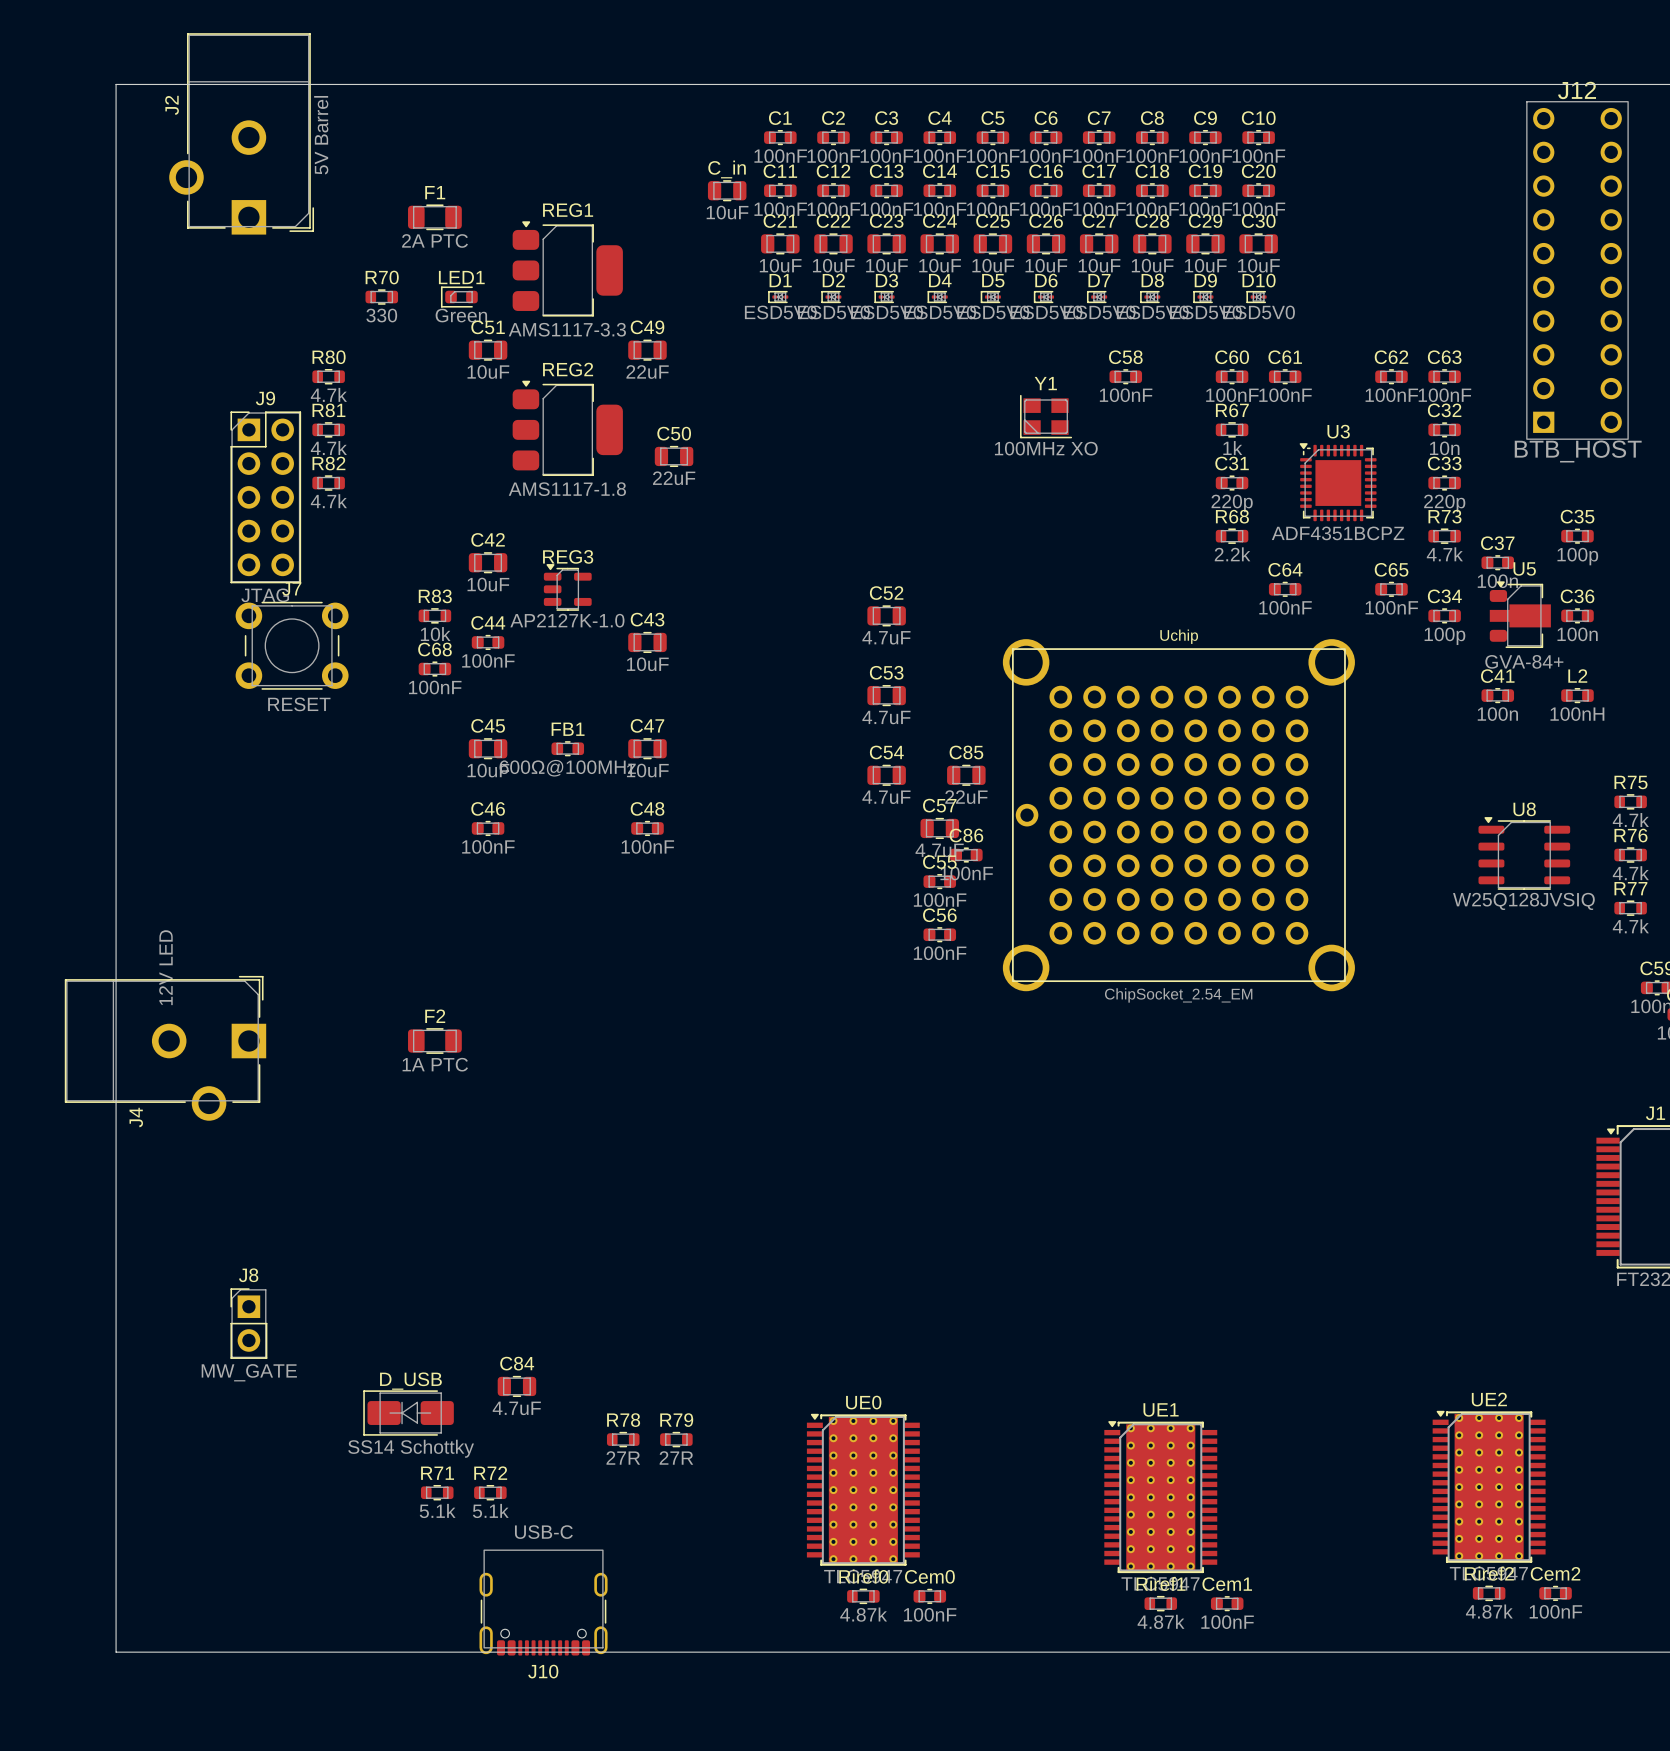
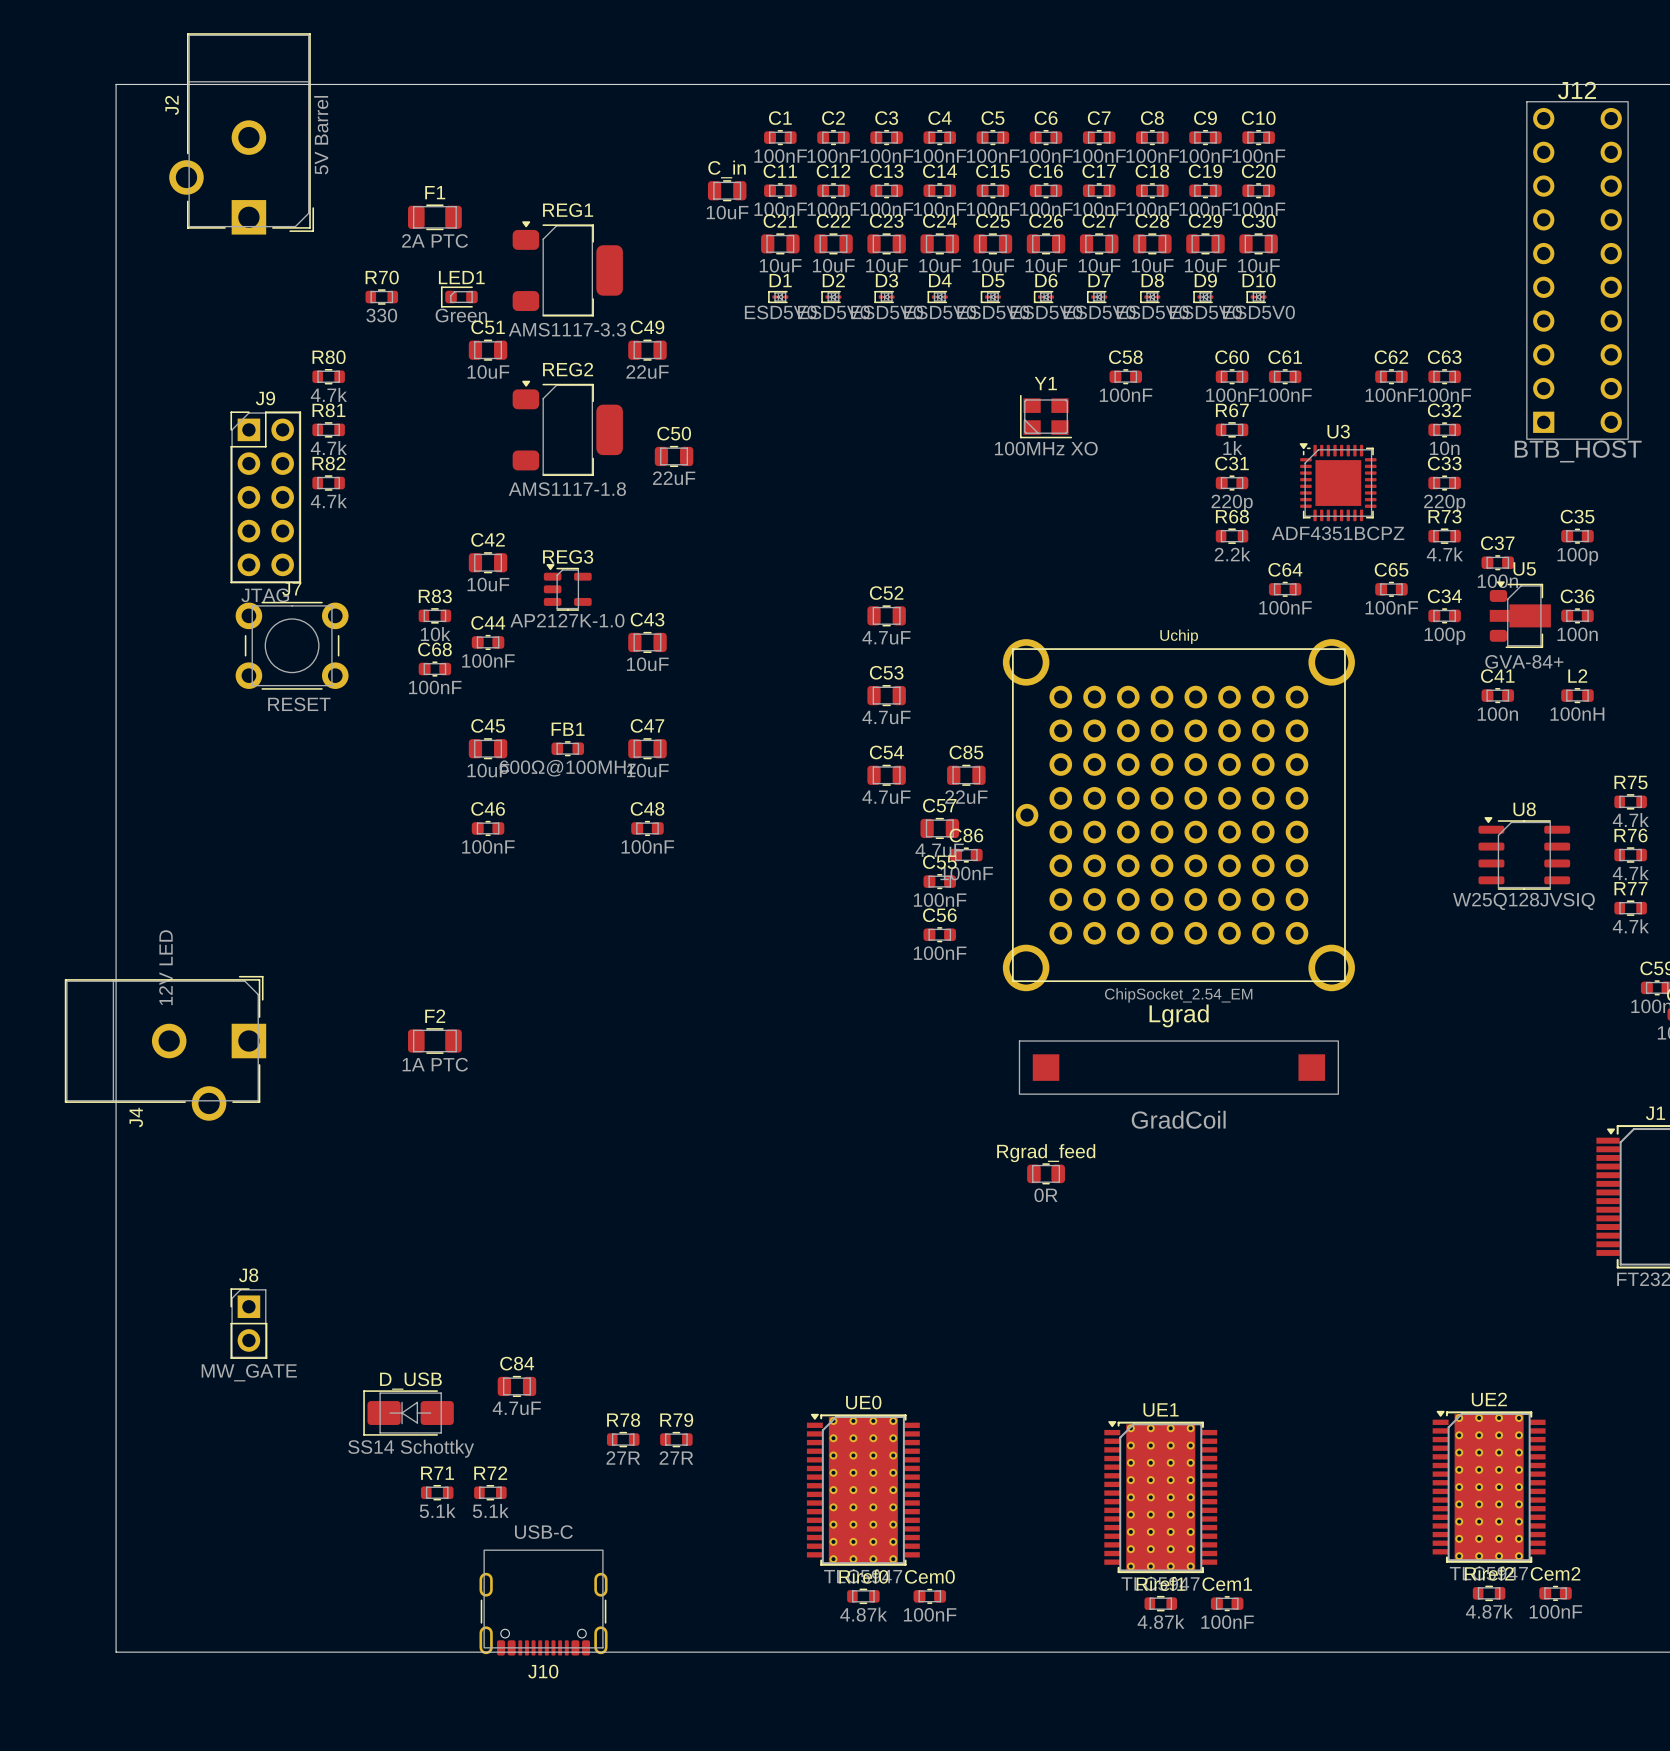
REG1 footprint: [512, 221, 623, 317] -> [512, 221, 623, 317]
REG2 footprint: [512, 380, 623, 476] -> [512, 380, 623, 476]
Lgrad: none -> GradCoil (1178, 1067)
Rgrad_feed: none -> 0R (1046, 1173)

